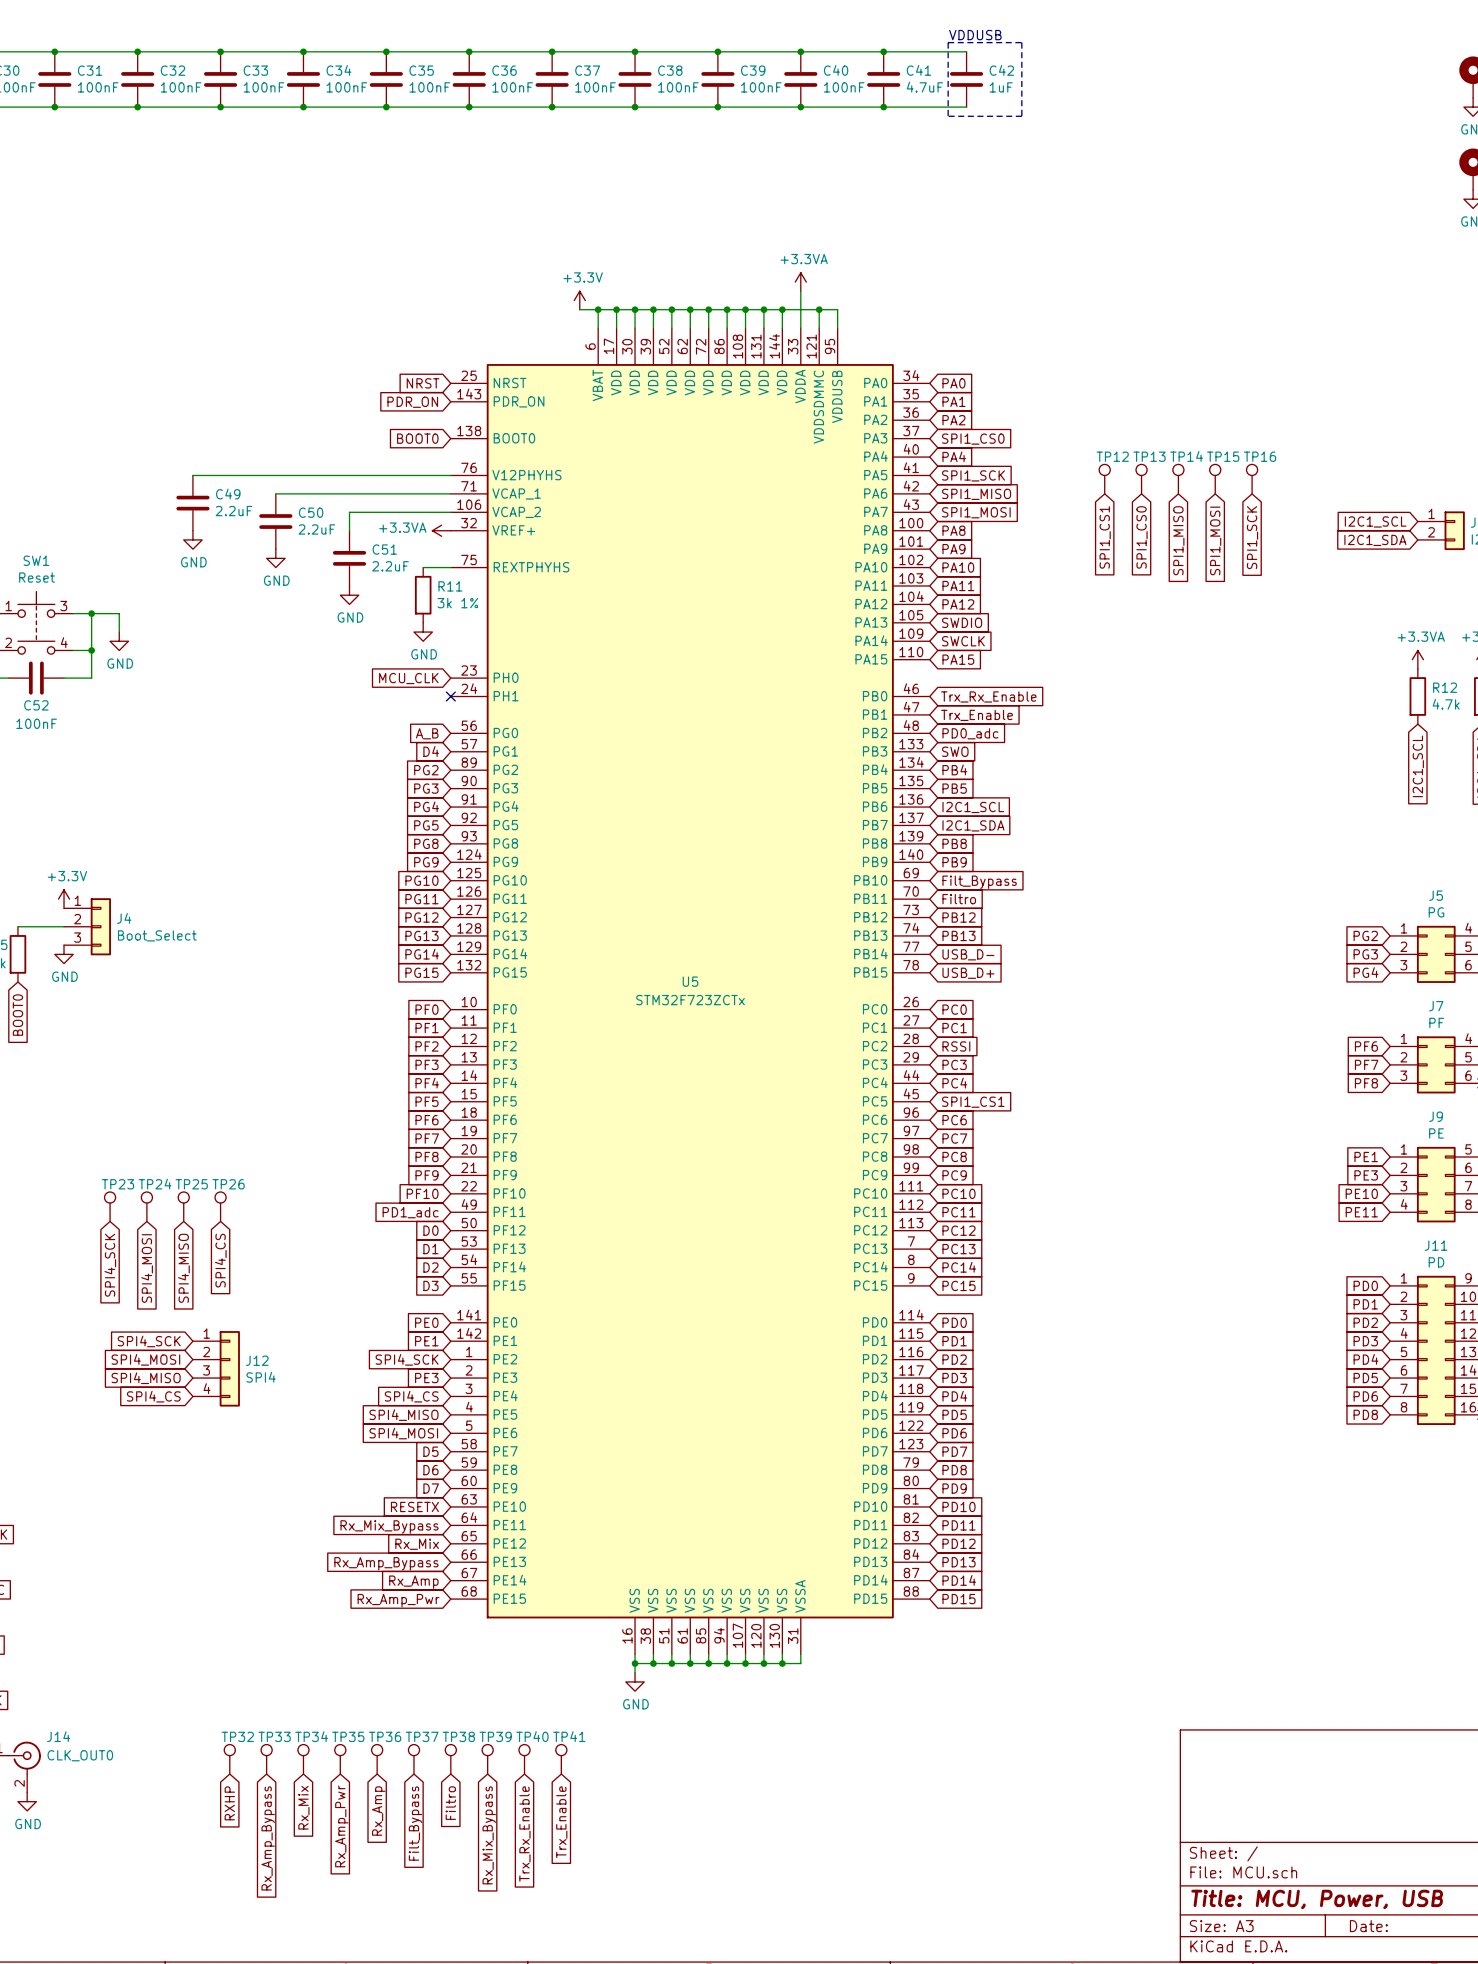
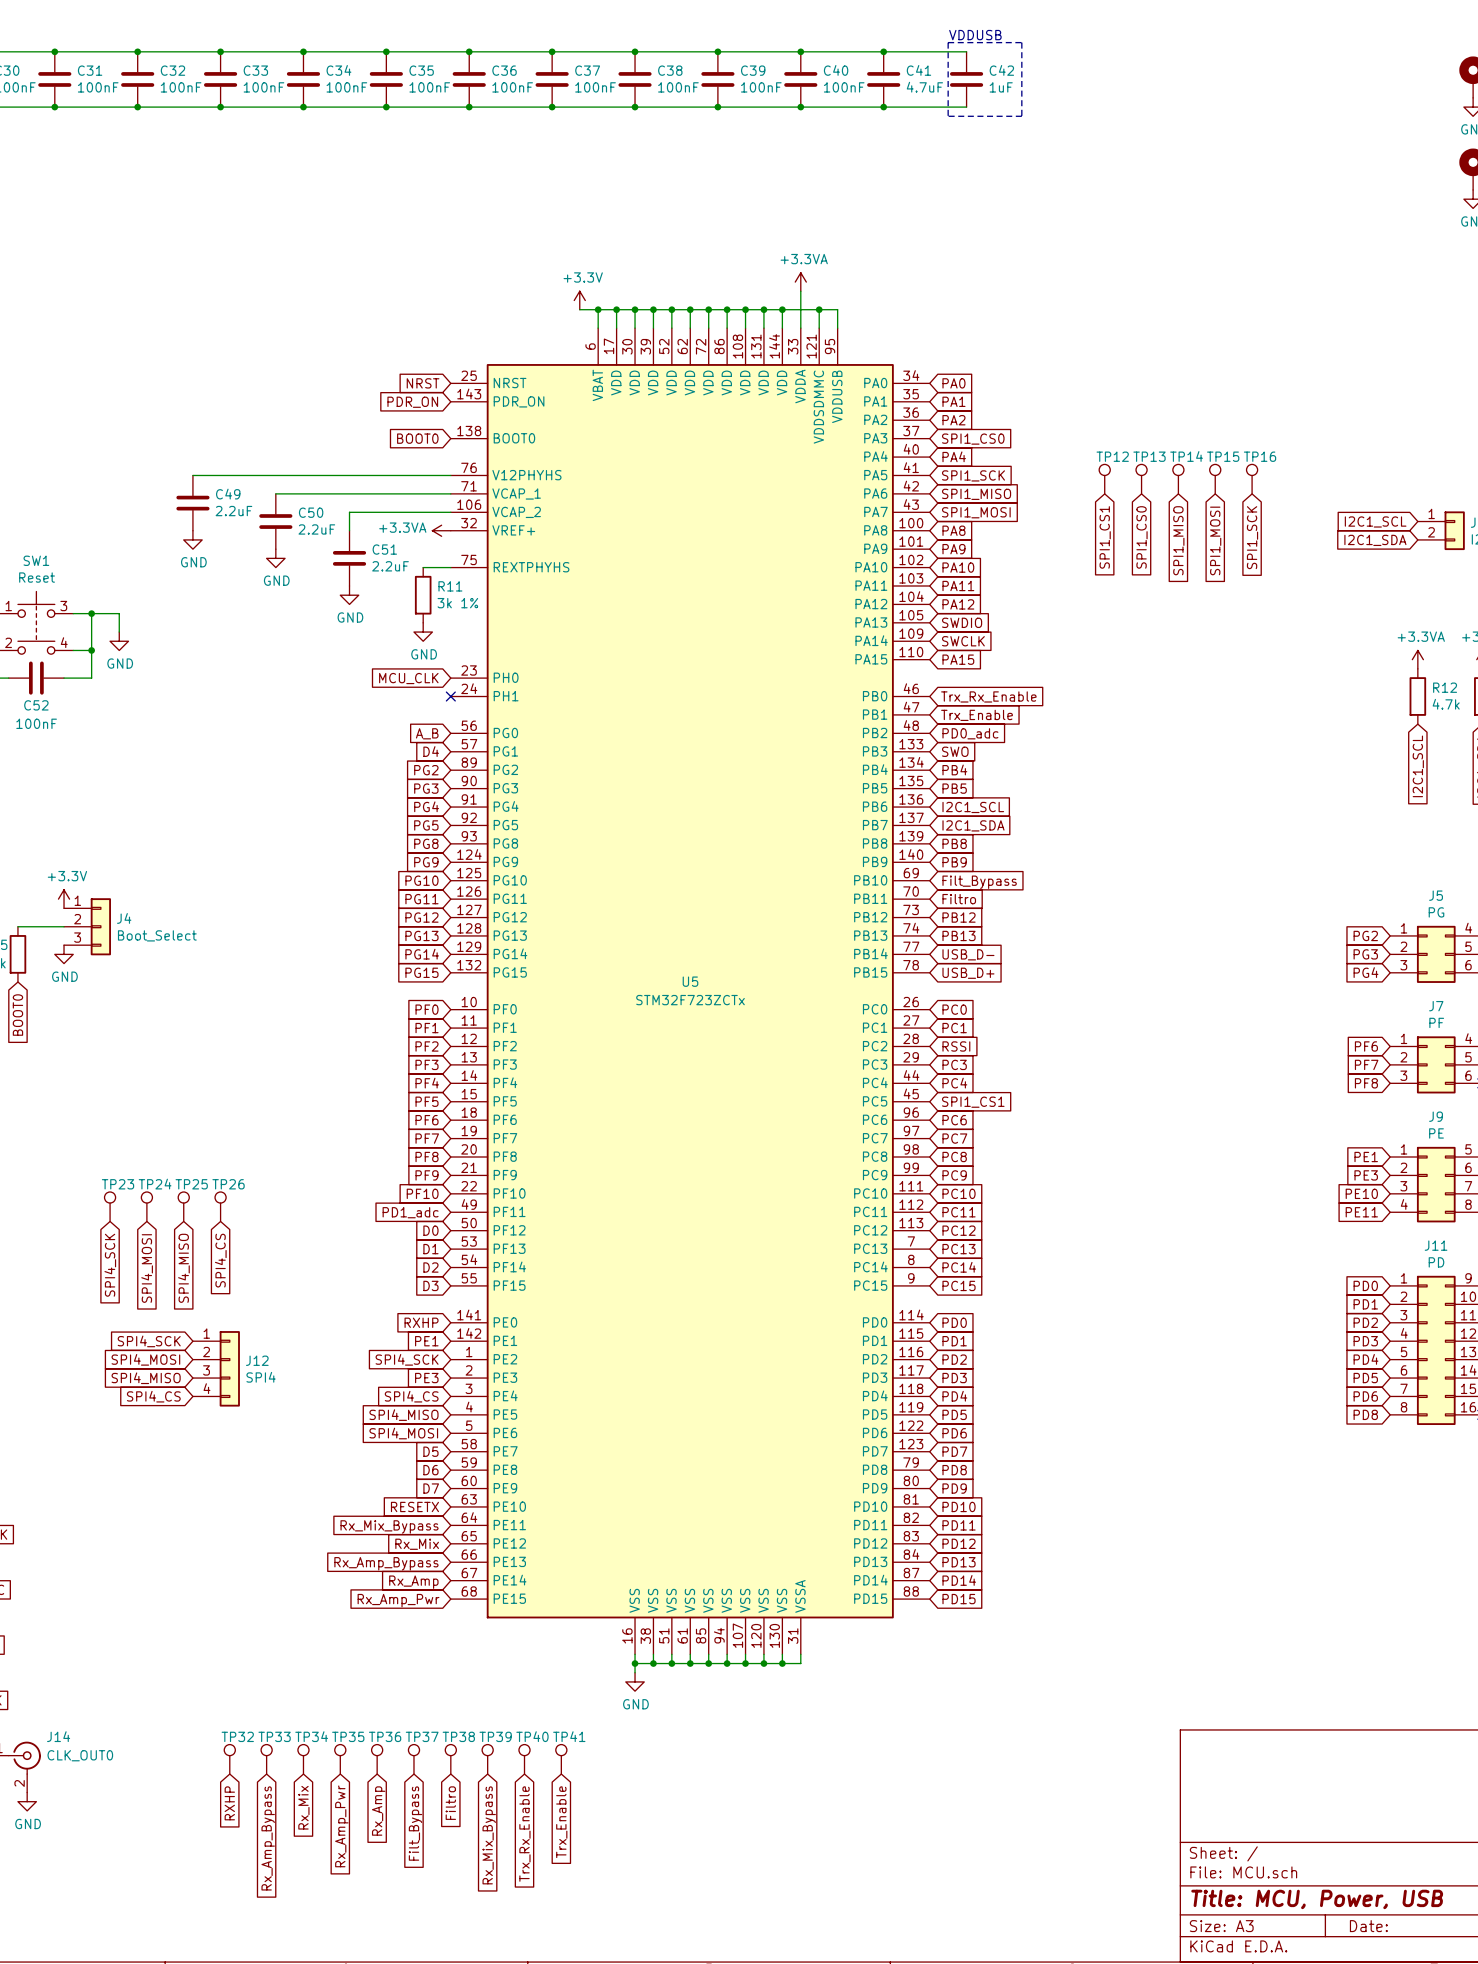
global label: PE0 (426, 1322) -> RXHP (421, 1322)

